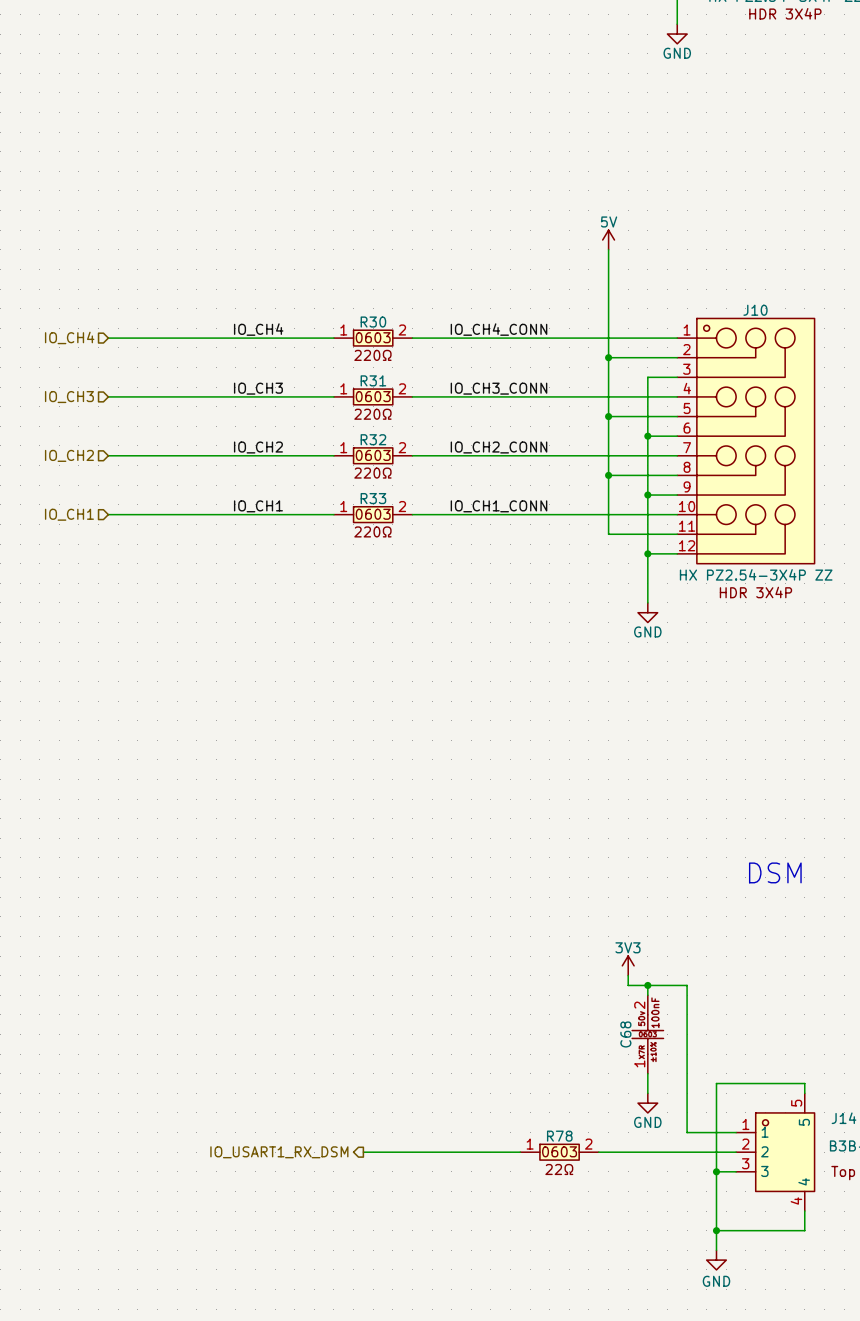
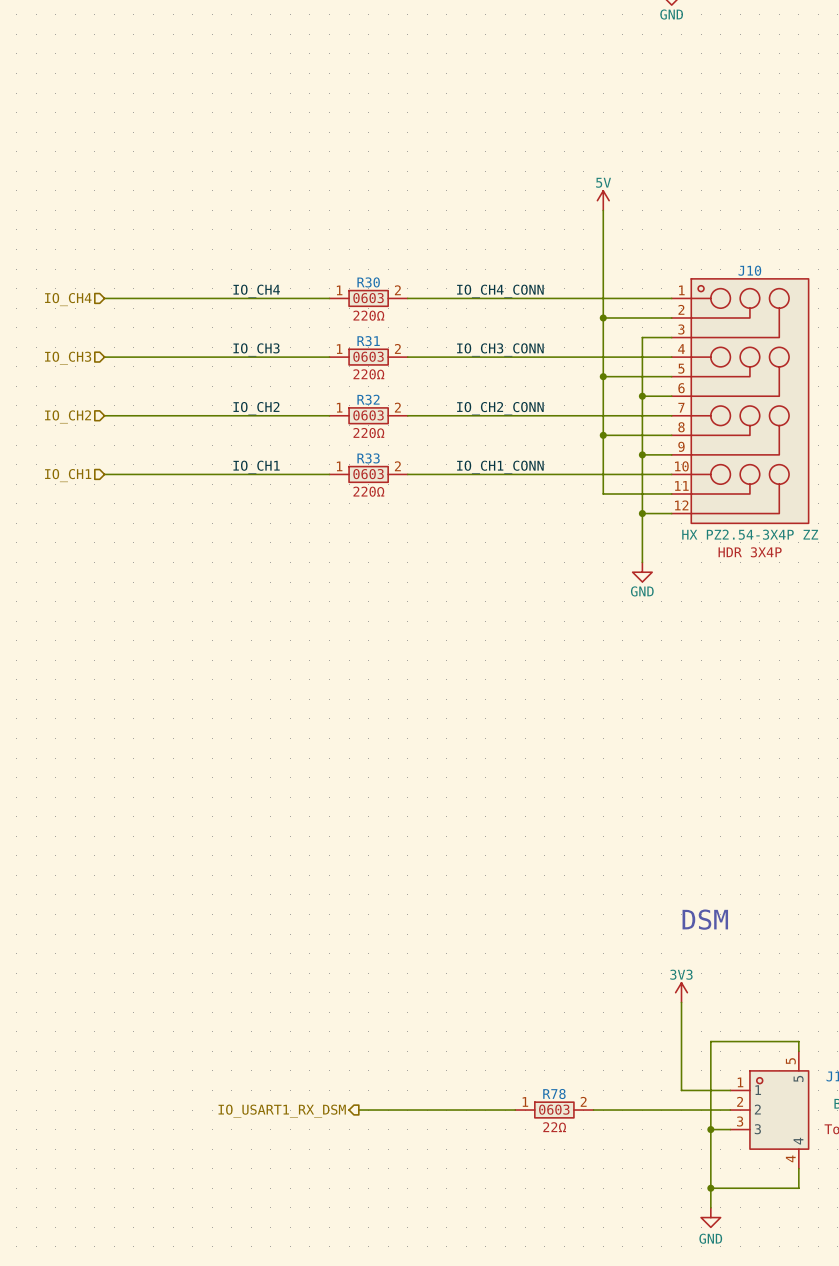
text position: DSM (775, 872) -> DSM (705, 919)
power symbol position: 3V3 (628, 965) -> 3V3 (681, 992)
wire: (628, 975) (628, 985) (687, 985) (687, 1044) -> none
wire: (647, 985) (647, 995) -> none
junction: (647, 985) -> none
C68: (647, 1034) -> none
wire: (647, 1073) (647, 1093) -> none
power symbol: GND (647, 1103) -> none

